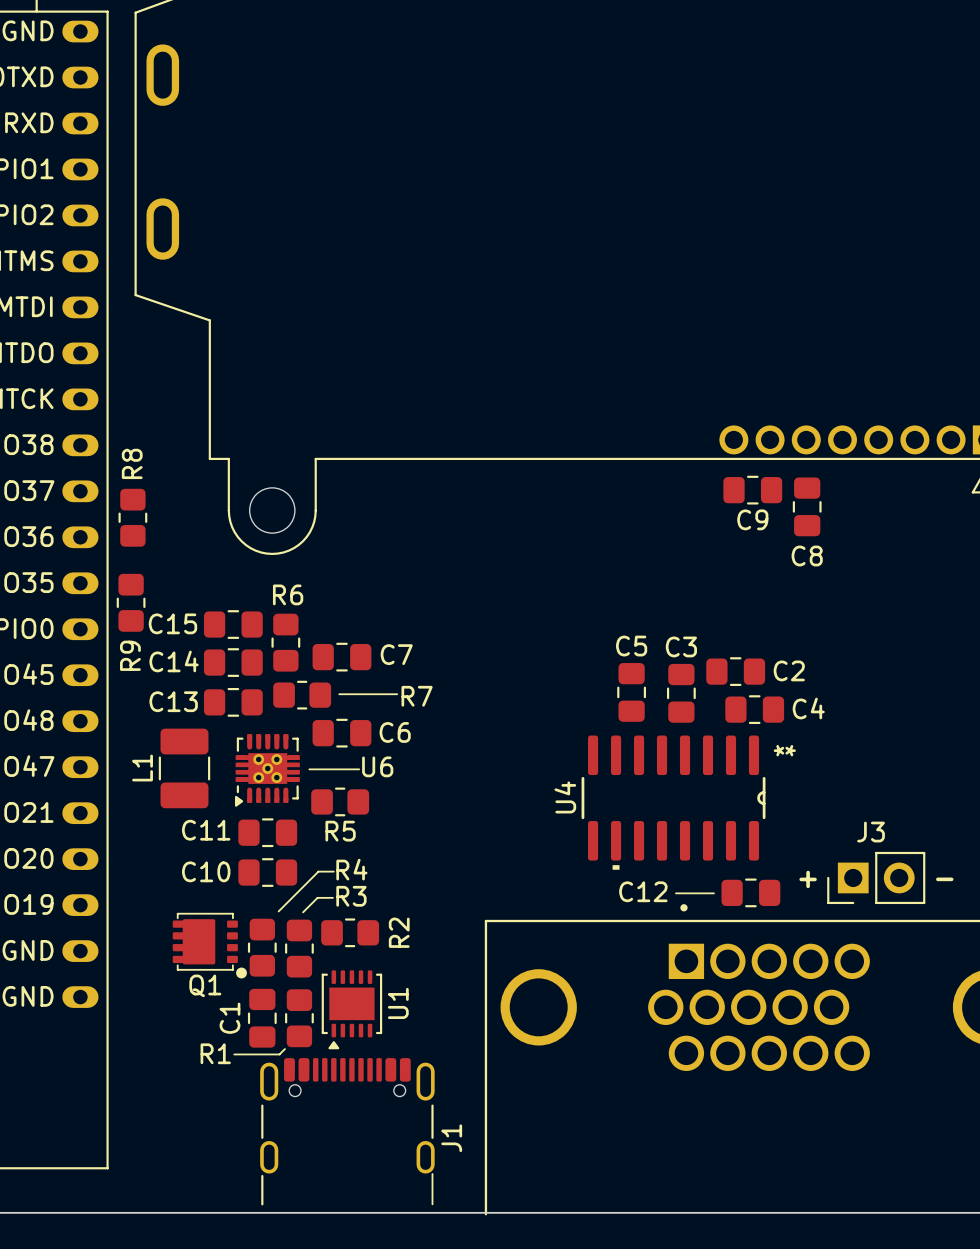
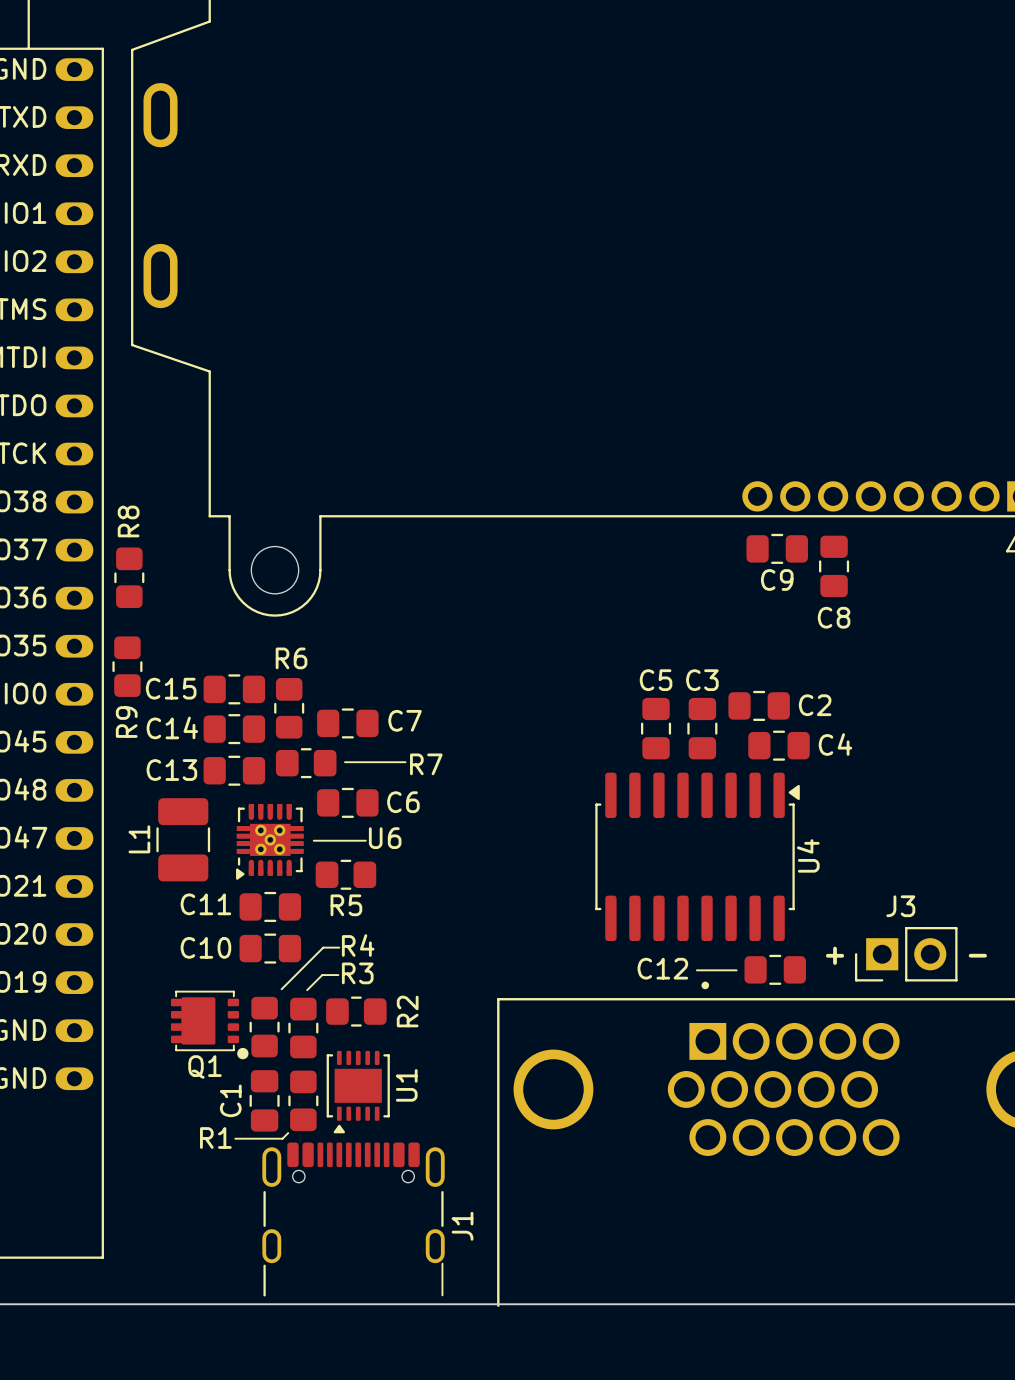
C2 position: (735, 671) -> (759, 705)
C5 position: (631, 692) -> (656, 728)
C3 position: (681, 693) -> (702, 728)
C4 position: (754, 709) -> (779, 745)
U4 footprint: [581, 735, 766, 870] -> [595, 772, 800, 942]
U4 name position: U4 (565, 797) -> U4 (808, 855)

